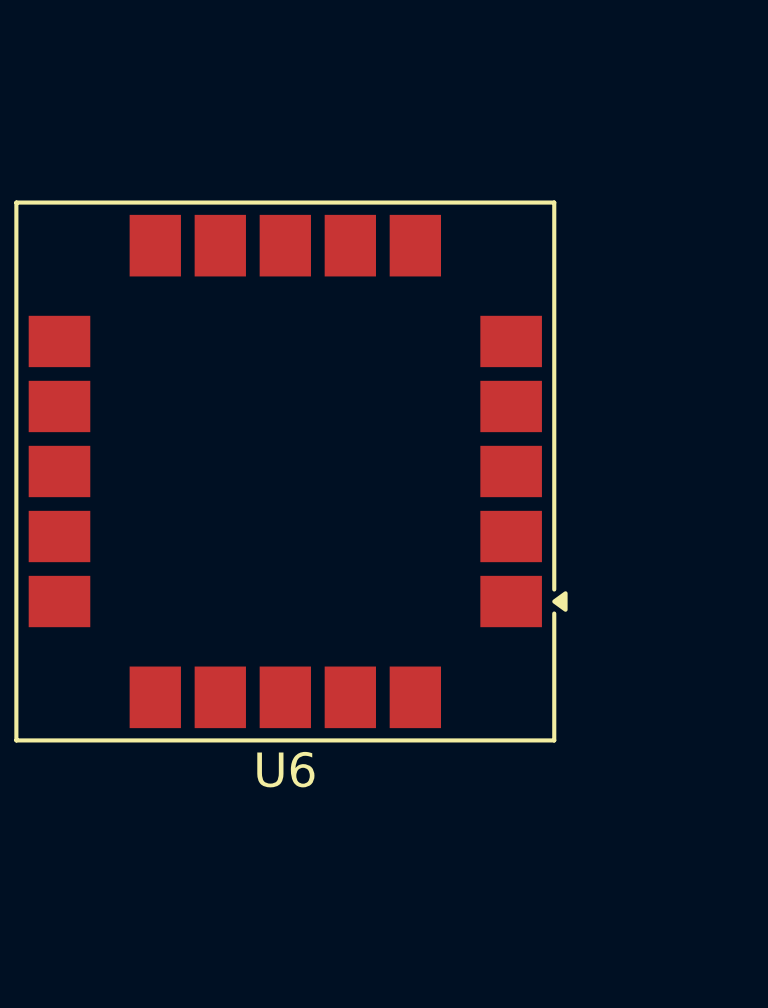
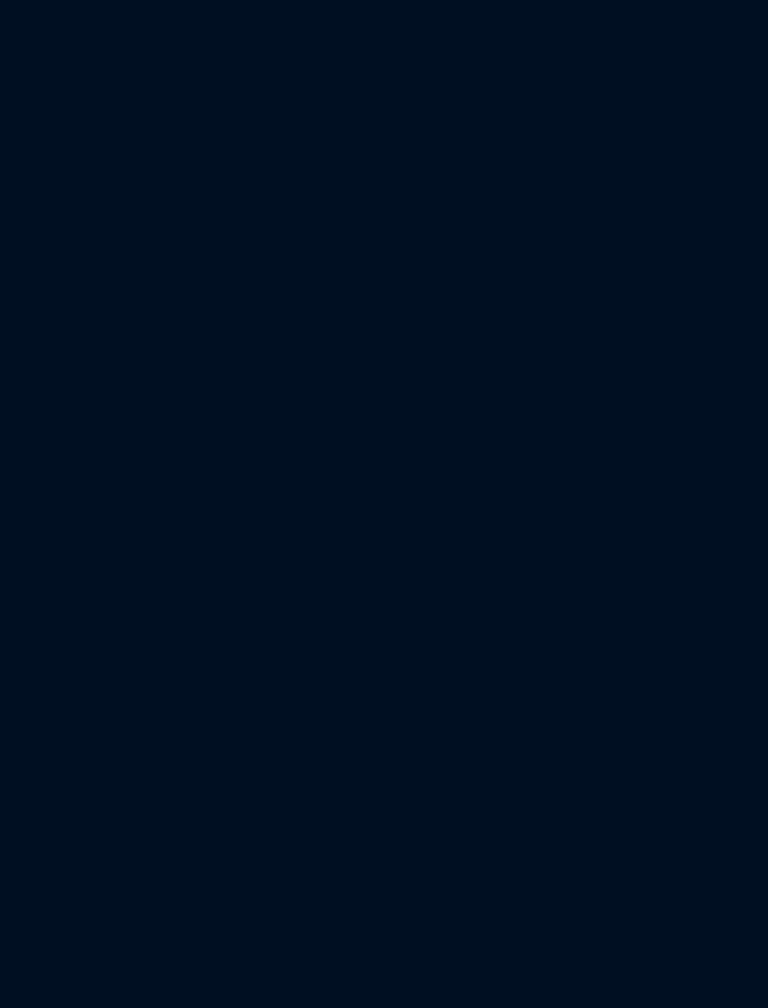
U6: (290, 471) -> none

